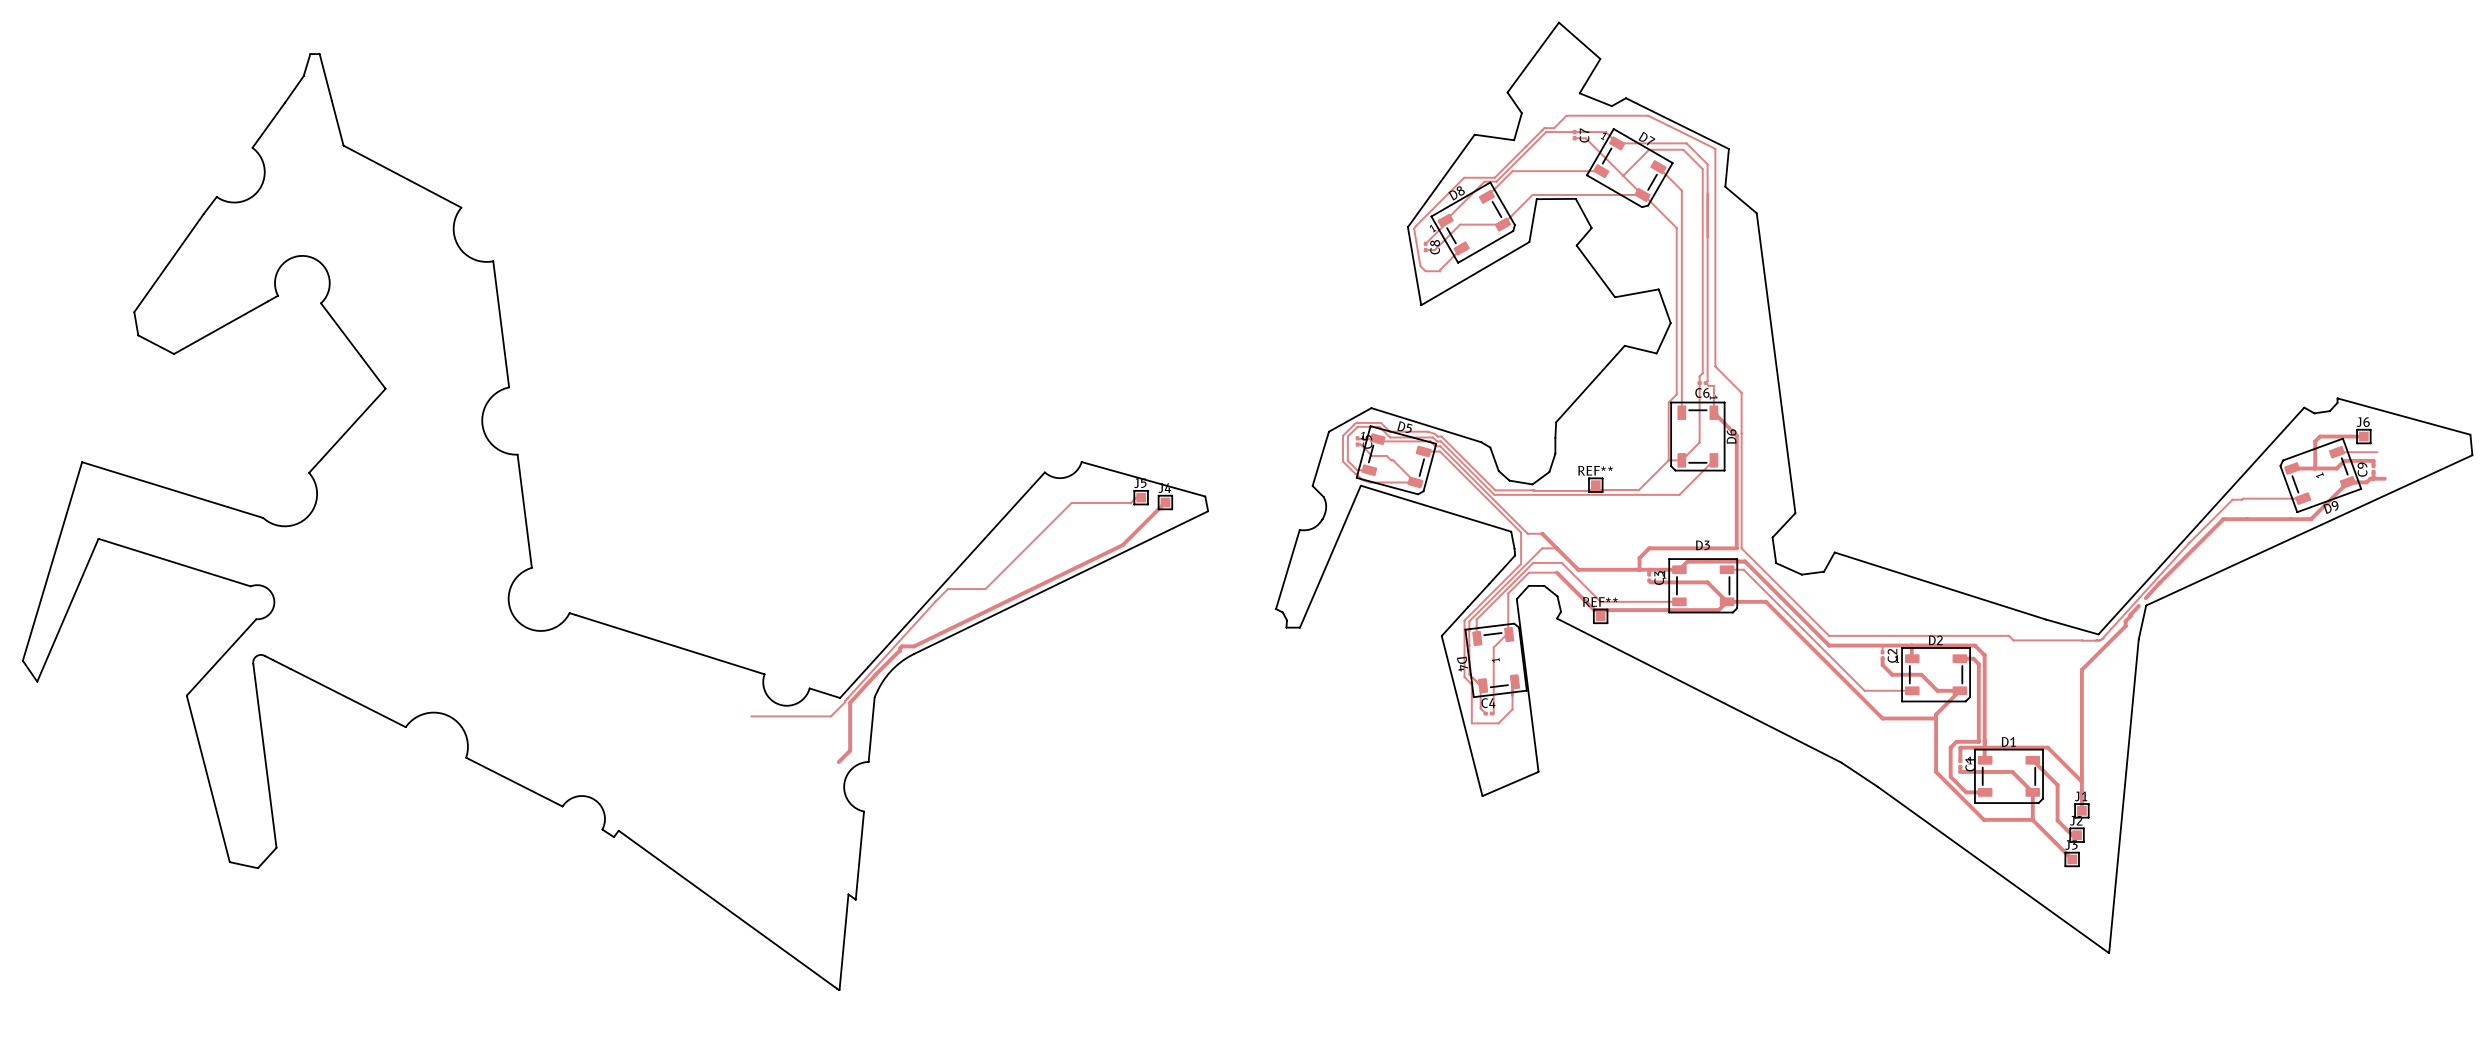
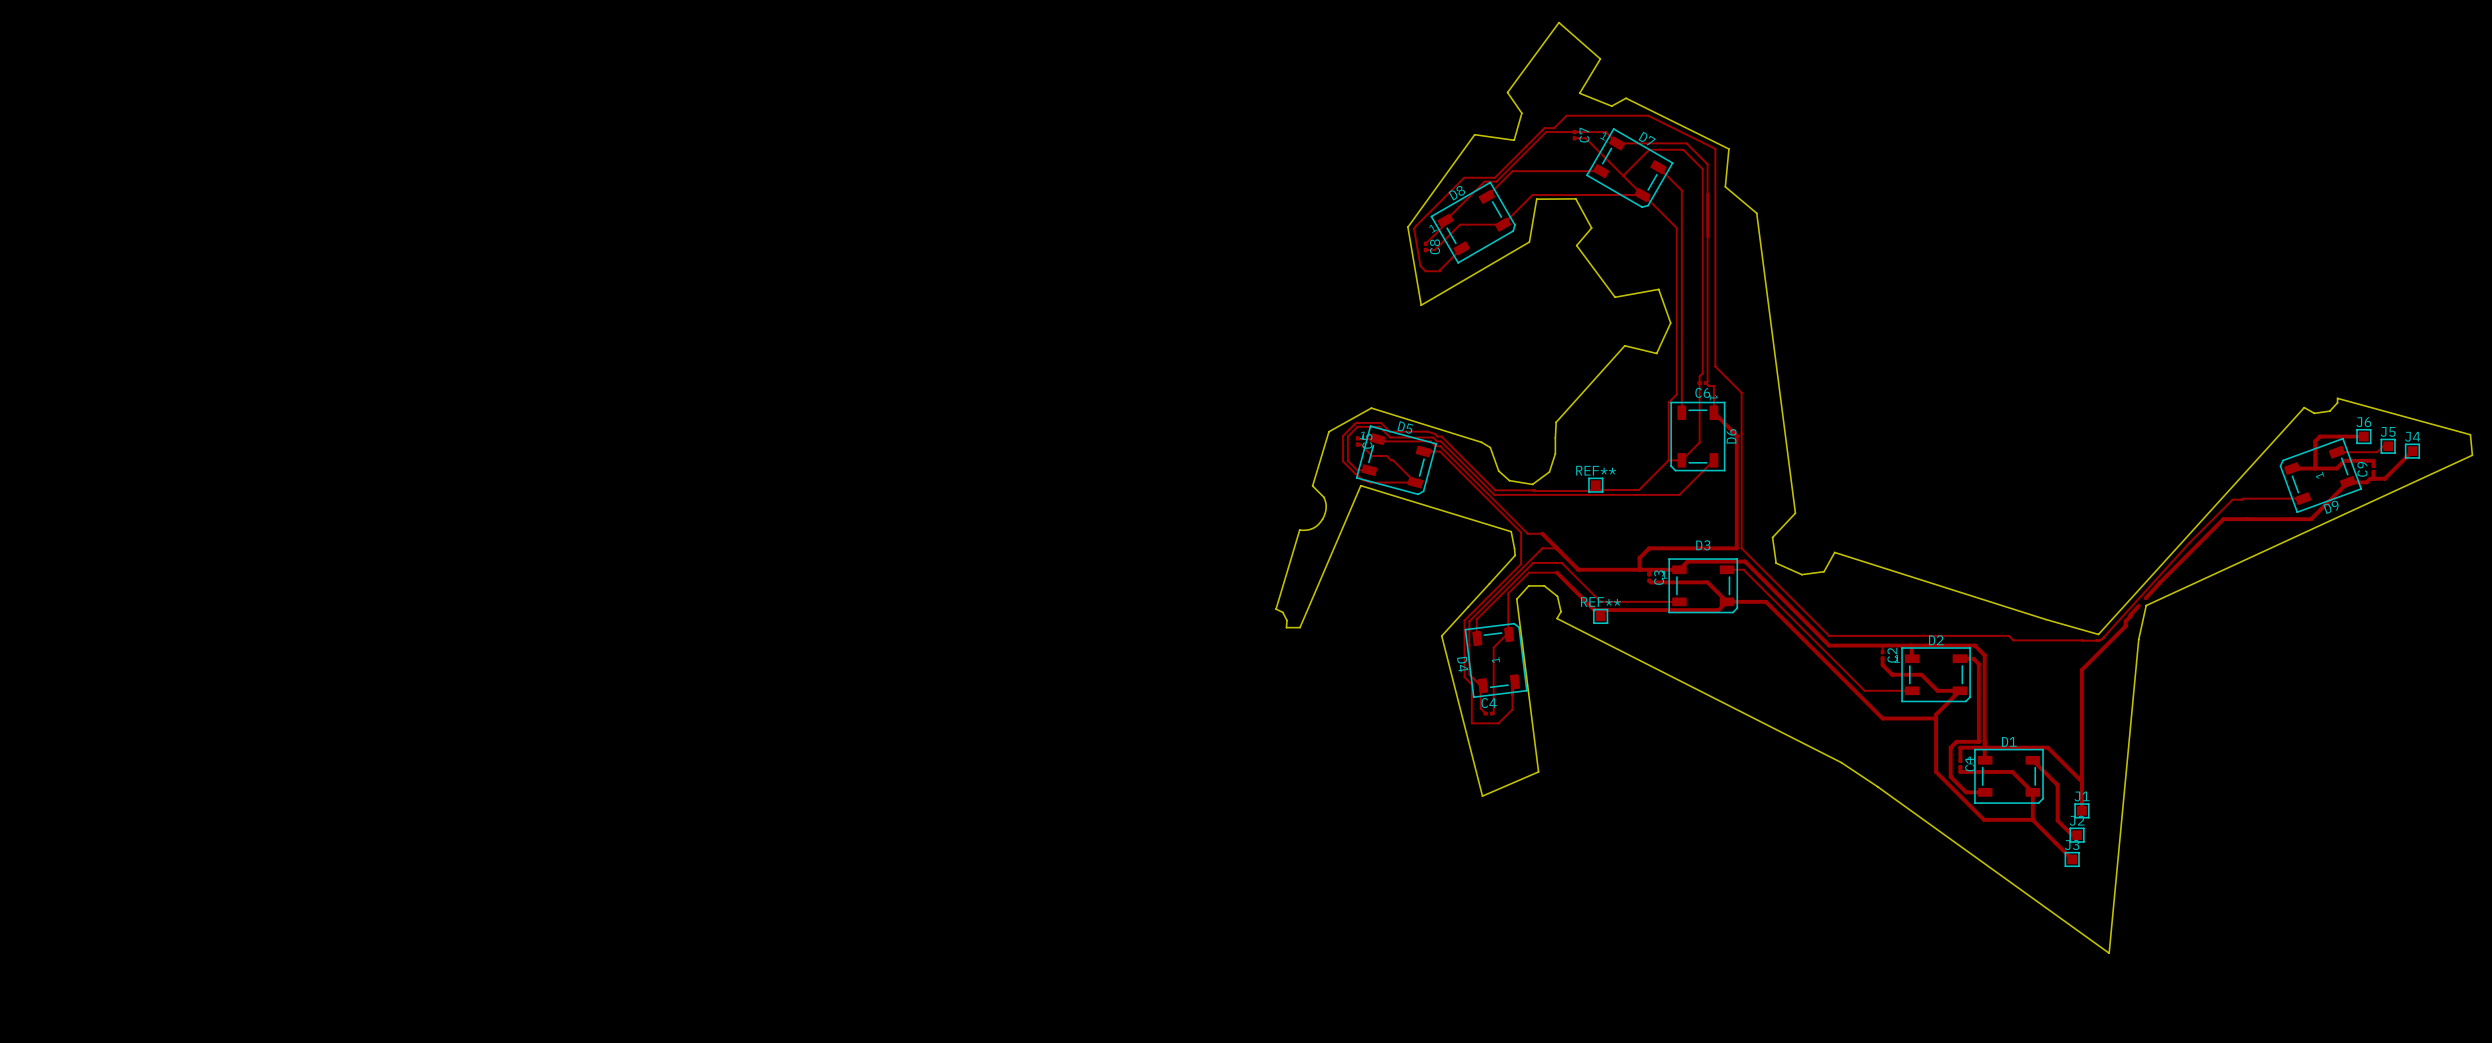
board edge: (310, 54) (319, 54) (343, 145) (461, 207) (455, 218) (453, 226) (455, 238) (458, 245) (466, 254) (473, 259) (485, 261) (493, 261) (509, 387) (497, 392) (488, 400) (483, 412) (482, 424) (486, 436) (494, 446) (505, 452) (517, 454) (531, 567) (515, 578) (510, 589) (508, 601) (513, 616) (525, 626) (536, 630) (548, 630) (562, 622) (569, 613) (764, 674) (763, 682) (765, 691) (769, 698) (779, 704) (788, 705) (796, 703) (803, 698) (809, 688) (840, 698) (1044, 472) (1054, 477) (1066, 477) (1075, 471) (1081, 462) (1205, 496) (1208, 511) (914, 653) (897, 664) (884, 679) (874, 697) (868, 761) (859, 763) (852, 768) (846, 775) (844, 784) (845, 793) (849, 801) (855, 808) (864, 811) (855, 899) (848, 894) (839, 989) (618, 830) (614, 837) (602, 829) (604, 821) (604, 812) (600, 804) (593, 799) (585, 796) (576, 796) (568, 800) (562, 806) (466, 757) (467, 744) (464, 731) (459, 724) (449, 716) (436, 712) (427, 713) (415, 717) (405, 727) (261, 654) (255, 656) (253, 663) (276, 847) (257, 868) (229, 862) (186, 695) (256, 619) (264, 617) (271, 611) (273, 605) (273, 597) (270, 591) (263, 586) (250, 586) (98, 538) (37, 681) (22, 660) (82, 462) (263, 517) (277, 525) (293, 525) (307, 517) (315, 503) (316, 487) (309, 472) (385, 388) (321, 303) (328, 291) (329, 277) (319, 262) (307, 256) (293, 257) (279, 268) (274, 282) (277, 295) (174, 354) (138, 335) (134, 312) (216, 196) (227, 201) (243, 201) (253, 195) (261, 186) (264, 175) (263, 163) (260, 156) (252, 147) (303, 76) (310, 54) -> none
track: none -> (2388, 446) (2383, 446) (2377, 452)
track: none -> (2412, 451) (2384, 478)
track: (1141, 497) (1136, 497) (1130, 503) -> none
J5 position: (1141, 497) -> (2388, 446)
track: (1130, 502) (1071, 502) (985, 589) (948, 589) (845, 700) -> none
track: (1165, 502) (1122, 545) (914, 646) (901, 646) (850, 702) (850, 750) (838, 762) -> none
J4 position: (1165, 502) -> (2412, 451)
track: (845, 701) (830, 716) (751, 716) -> none

